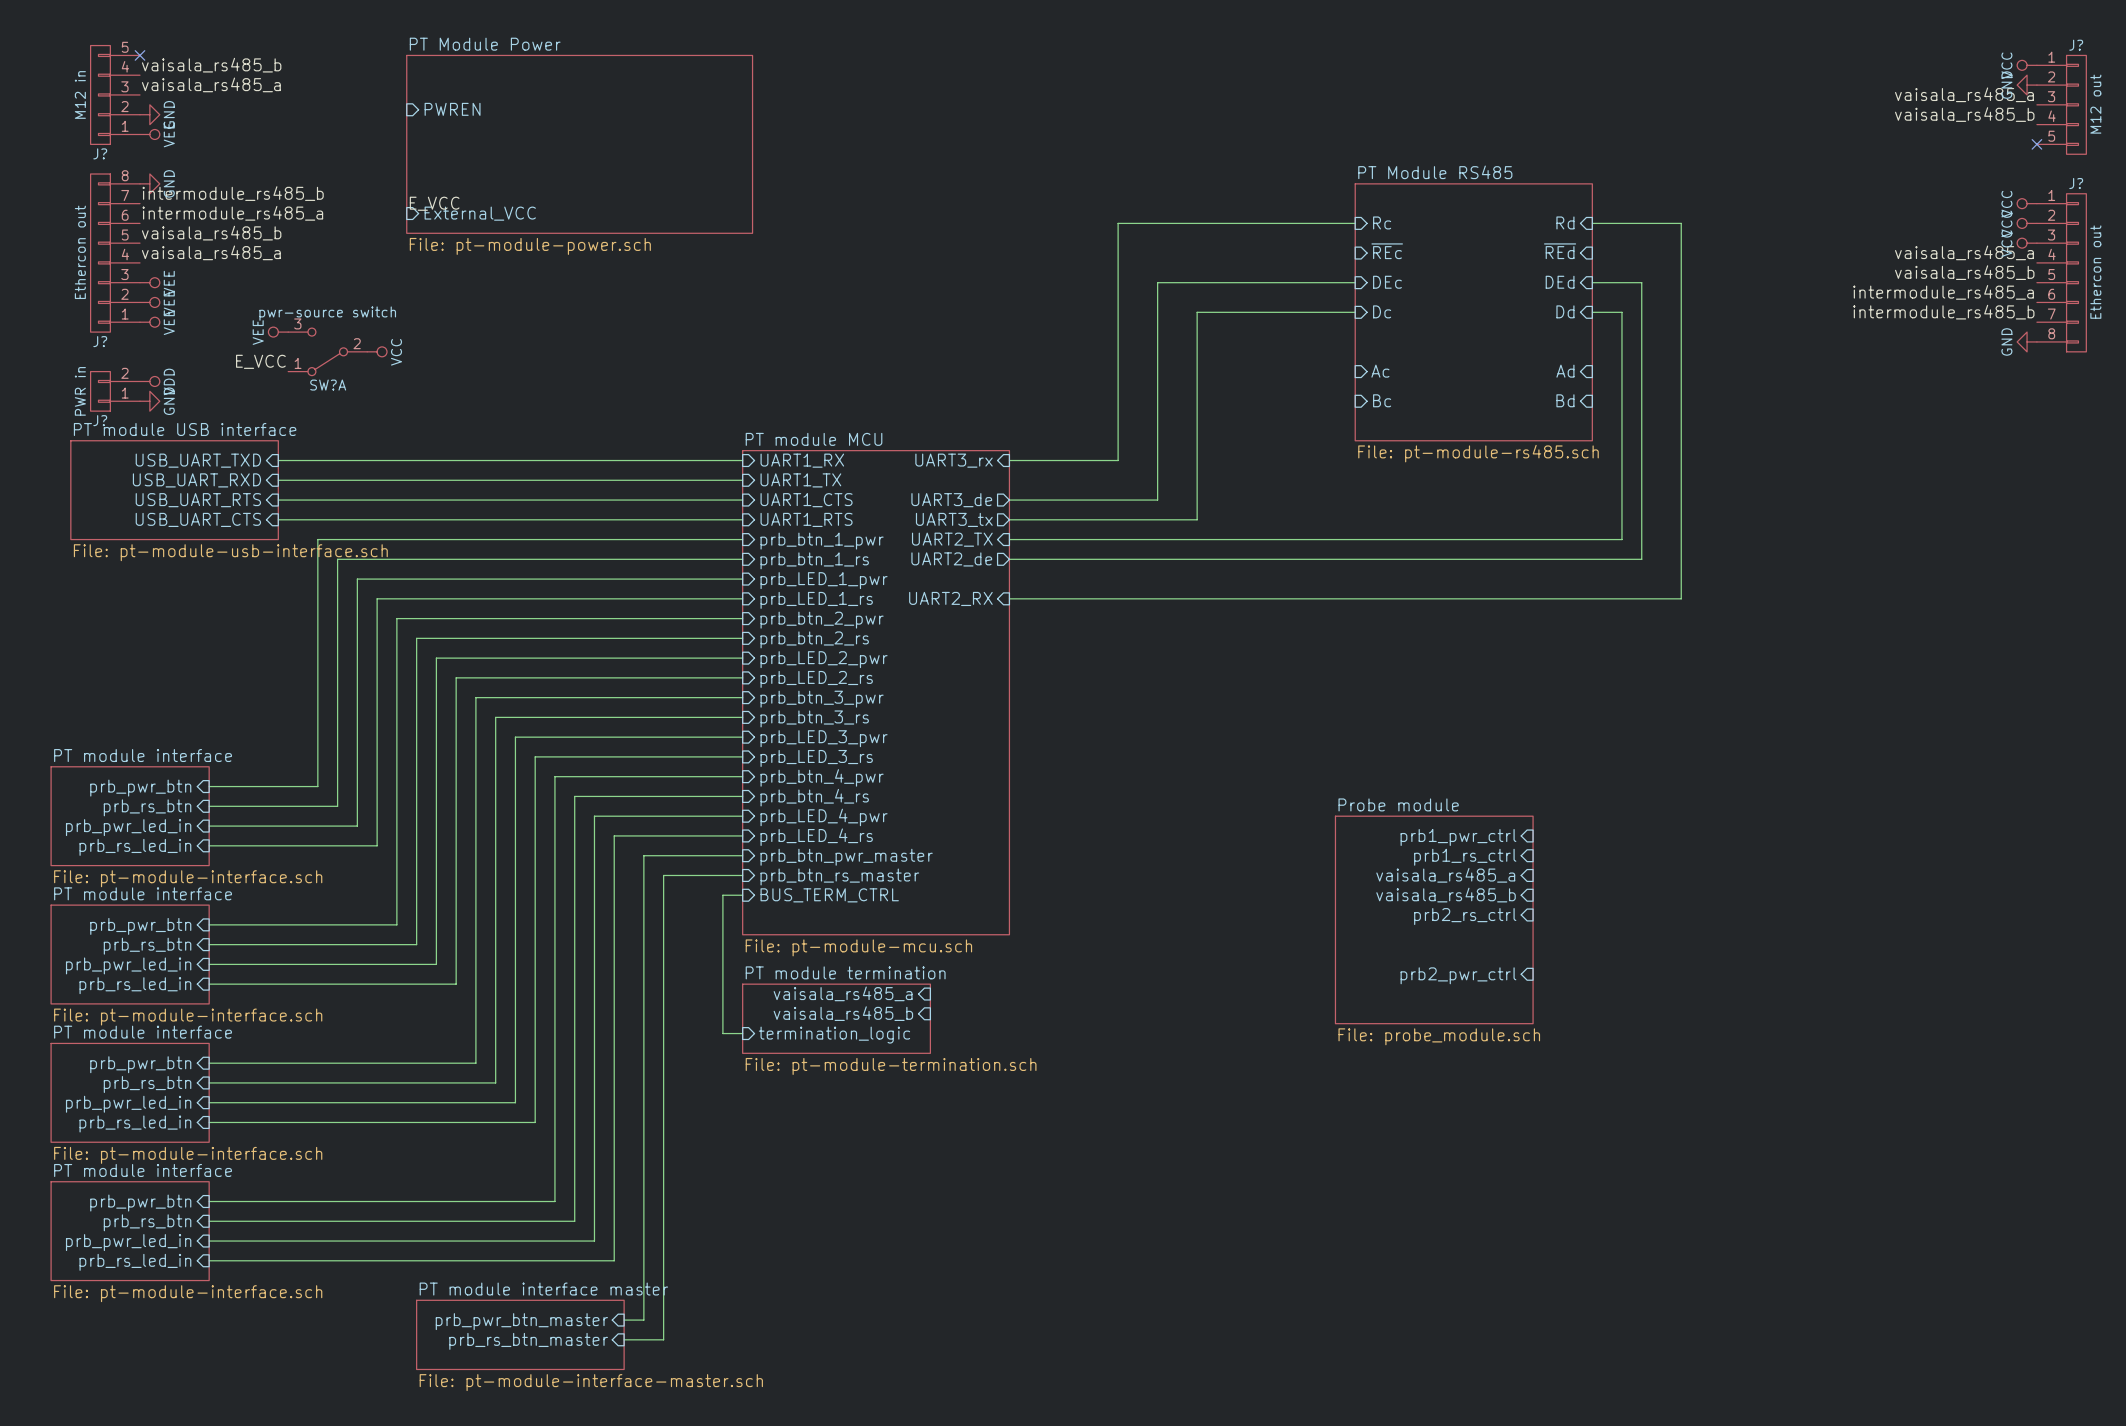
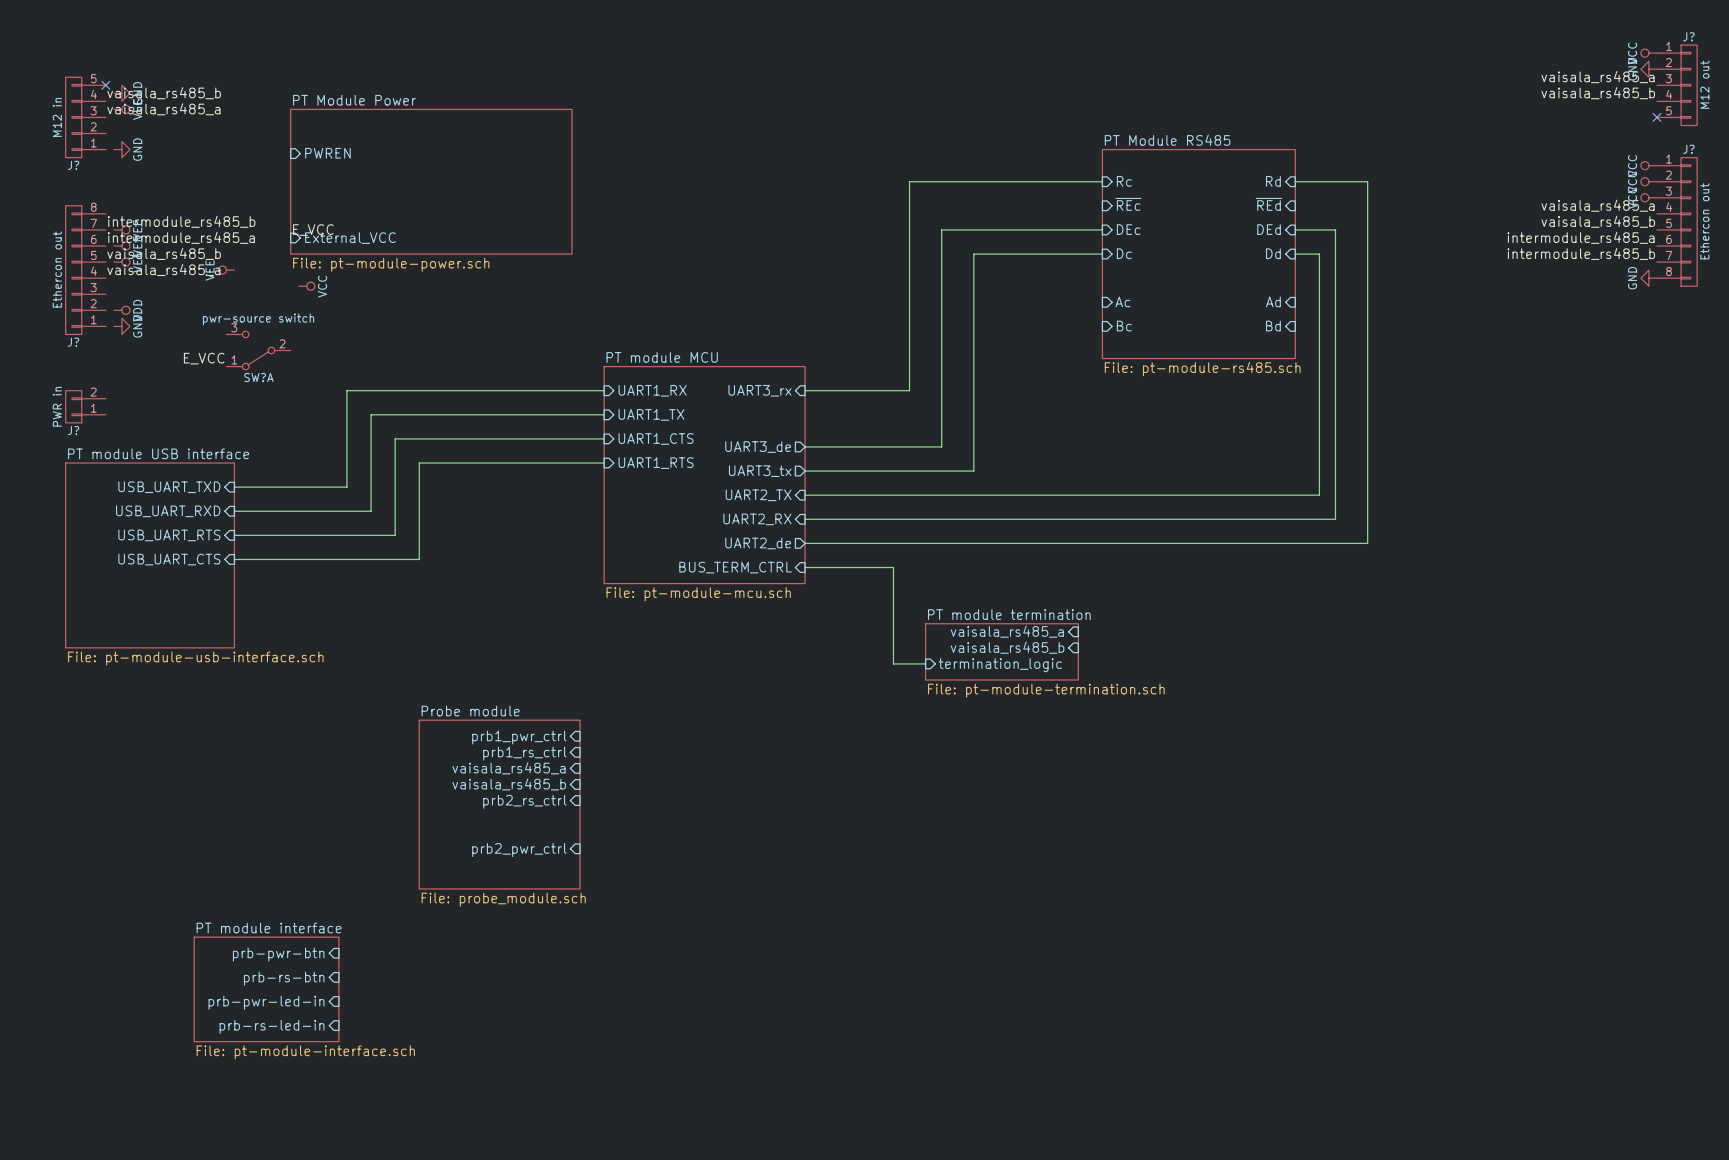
no-connect mark: (140, 55) -> none
label position: vaisala_rs485_b (211, 65) -> vaisala_rs485_b (164, 93)
label position: vaisala_rs485_a (211, 84) -> vaisala_rs485_a (163, 109)
J? position: (115, 94) -> (85, 117)
no-connect mark: none -> (105, 85)
sheet pin position: PWREN (452, 109) -> PWREN (327, 153)
sheet PT Module Power position: (579, 144) -> (431, 181)
label position: intermodule_rs485_b (233, 193) -> intermodule_rs485_b (181, 221)
label: E_VCC (434, 203) -> none
label position: intermodule_rs485_a (232, 213) -> intermodule_rs485_a (181, 237)
sheet pin position: External_VCC (480, 213) -> External_VCC (350, 238)
label: vaisala_rs485_b (211, 233) -> none
label: vaisala_rs485_a (211, 252) -> none
J? position: (115, 253) -> (85, 270)
label: none -> E_VCC (313, 230)
label: none -> vaisala_rs485_b (164, 253)
label: none -> vaisala_rs485_a (163, 269)
SW?A position: (327, 351) -> (258, 350)
label: E_VCC (260, 361) -> none
J? position: (115, 391) -> (85, 406)
label: none -> E_VCC (204, 358)
sheet pin position: USB_UART_TXD (198, 460) -> USB_UART_TXD (169, 487)
wire: (278, 460) (742, 460) -> none
sheet pin: UART1_RX (802, 460) -> none
sheet pin position: UART3_rx (954, 460) -> UART3_rx (759, 390)
wire: (1009, 460) (1118, 460) -> (805, 390) (909, 390) (909, 374)
sheet pin position: USB_UART_RXD (196, 480) -> USB_UART_RXD (168, 511)
wire: (278, 480) (426, 480) -> (346, 487) (346, 390)
sheet pin: UART1_TX (800, 480) -> UART1_RX (652, 390)
sheet PT module USB interface: File: pt-module-usb-interface.sch (174, 490) -> none
sheet pin position: USB_UART_RTS (198, 500) -> USB_UART_RTS (169, 535)
wire: (278, 500) (742, 500) -> none
sheet pin: UART1_CTS (806, 500) -> UART1_TX (651, 414)
sheet pin position: UART3_de (951, 500) -> UART3_de (758, 447)
wire: (1009, 500) (1157, 500) -> (805, 446) (941, 446) (941, 406)
wire: none -> (604, 414) (371, 414) (371, 511) (234, 511)
sheet pin position: USB_UART_CTS (198, 519) -> USB_UART_CTS (169, 559)
wire: (278, 519) (742, 519) -> none
sheet pin position: UART1_RTS (806, 519) -> UART1_RTS (656, 463)
sheet pin position: UART3_tx (954, 519) -> UART3_tx (760, 471)
wire: (1009, 519) (1197, 519) -> (805, 471) (973, 471) (973, 422)
wire: (485, 539) (317, 539) (317, 786) (209, 786) -> none
sheet pin position: UART2_TX (952, 539) -> UART2_TX (758, 495)
wire: (1009, 539) (1621, 539) -> (805, 495) (1319, 495) (1319, 438)
sheet pin: prb_btn_1_pwr (822, 541) -> UART1_CTS (656, 439)
wire: (742, 559) (337, 559) (337, 806) (209, 806) -> none
sheet pin position: UART2_de (951, 559) -> UART2_de (758, 543)
wire: (1009, 559) (1641, 559) -> (805, 519) (1335, 519) (1335, 454)
sheet pin: prb_btn_1_rs (814, 560) -> none
wire: none -> (604, 463) (419, 463) (419, 559) (234, 559)
wire: (742, 579) (357, 579) (357, 826) (209, 826) -> none
sheet pin: prb_LED_1_pwr (824, 580) -> none
sheet PT module MCU: none -> File: pt-module-mcu.sch (704, 475)
wire: (377, 598) (377, 845) (209, 845) -> (306, 487) (234, 487)
wire: (426, 598) (742, 598) -> none
sheet pin position: UART2_RX (950, 598) -> UART2_RX (757, 519)
wire: (1009, 598) (1681, 598) -> (805, 543) (1367, 543) (1367, 487)
sheet pin: prb_LED_1_rs (816, 600) -> none
wire: (742, 618) (396, 618) (396, 924) (209, 924) -> none
sheet pin: prb_btn_2_pwr (822, 620) -> none
wire: (742, 638) (416, 638) (416, 944) (209, 944) -> none
sheet pin: prb_btn_2_rs (814, 639) -> none
wire: (436, 658) (436, 964) (209, 964) -> (354, 535) (234, 535)
wire: (485, 658) (742, 658) -> (395, 535) (395, 438)
sheet pin: prb_LED_2_pwr (824, 659) -> none
wire: (742, 677) (456, 677) (456, 984) (209, 984) -> none
sheet pin: prb_LED_2_rs (816, 679) -> none
sheet PT module USB interface: none -> File: pt-module-usb-interface.sch (150, 555)
sheet PT module MCU: File: pt-module-mcu.sch (876, 692) -> none
wire: (742, 697) (475, 697) (475, 1063) (209, 1063) -> none
sheet pin: none -> BUS_TERM_CTRL (735, 567)
wire: none -> (805, 567) (893, 567) (893, 663) (925, 663)
sheet pin: prb_btn_3_pwr (822, 699) -> none
wire: (742, 717) (495, 717) (495, 1082) (209, 1082) -> none
sheet pin: prb_btn_3_rs (814, 718) -> none
wire: (742, 737) (515, 737) (515, 1102) (209, 1102) -> none
sheet pin: prb_LED_3_pwr (824, 738) -> none
wire: (742, 756) (535, 756) (535, 1122) (209, 1122) -> none
sheet pin: prb_LED_3_rs (816, 758) -> none
wire: (742, 776) (554, 776) (554, 1201) (209, 1201) -> none
sheet pin: none -> vaisala_rs485_a (1007, 631)
sheet pin: prb_btn_4_pwr (822, 777) -> none
sheet pin: prb_pwr_btn (140, 788) -> none
wire: (742, 796) (574, 796) (574, 1221) (209, 1221) -> none
sheet pin: none -> vaisala_rs485_b (1007, 647)
sheet pin: prb_btn_4_rs (814, 797) -> none
sheet PT module termination: none -> File: pt-module-termination.sch (1001, 651)
sheet pin: prb_rs_btn (147, 807) -> none
sheet PT module interface: File: pt-module-interface.sch (130, 816) -> none
wire: (742, 816) (594, 816) (594, 1241) (209, 1241) -> none
sheet pin: prb_LED_4_pwr (824, 817) -> none
sheet pin: none -> termination_logic (1000, 665)
sheet pin: prb_pwr_led_in (128, 827) -> none
wire: (742, 835) (614, 835) (614, 1260) (209, 1260) -> none
sheet pin: prb_LED_4_rs (816, 837) -> none
sheet pin: prb1_pwr_ctrl (1458, 837) -> none
sheet pin: prb_rs_led_in (135, 847) -> none
wire: (742, 855) (643, 855) (643, 1320) (624, 1320) -> none
sheet pin: prb_btn_pwr_master (846, 857) -> none
sheet pin: prb1_rs_ctrl (1465, 857) -> none
wire: (742, 875) (663, 875) (663, 1339) (624, 1339) -> none
sheet pin: vaisala_rs485_a (1445, 875) -> none
sheet pin: prb_btn_rs_master (839, 877) -> none
wire: (742, 895) (722, 895) (722, 1033) (742, 1033) -> none
sheet pin: BUS_TERM_CTRL (829, 895) -> none
sheet pin: vaisala_rs485_b (1446, 895) -> none
sheet pin: none -> prb1_pwr_ctrl (519, 737)
sheet pin: prb2_rs_ctrl (1465, 916) -> none
sheet Probe module: File: probe_module.sch (1434, 919) -> none
sheet pin: prb_pwr_btn (140, 926) -> none
sheet pin: none -> prb1_rs_ctrl (524, 753)
sheet pin: none -> vaisala_rs485_a (509, 768)
sheet pin: prb_rs_btn (147, 946) -> none
sheet PT module interface: File: pt-module-interface.sch (130, 954) -> none
sheet pin: none -> vaisala_rs485_b (509, 784)
sheet pin: prb_pwr_led_in (128, 965) -> none
sheet pin: prb2_pwr_ctrl (1458, 975) -> none
sheet pin: prb_rs_led_in (135, 985) -> none
sheet pin: none -> prb2_rs_ctrl (524, 801)
sheet Probe module: none -> File: probe_module.sch (499, 804)
sheet pin: vaisala_rs485_a (843, 993) -> none
sheet pin: vaisala_rs485_b (843, 1013) -> none
sheet PT module termination: File: pt-module-termination.sch (836, 1018) -> none
sheet pin: termination_logic (834, 1035) -> none
sheet pin: none -> prb2_pwr_ctrl (519, 850)
sheet pin: prb_pwr_btn (140, 1064) -> none
sheet pin: prb_rs_btn (147, 1084) -> none
sheet PT module interface: File: pt-module-interface.sch (130, 1092) -> none
sheet pin: prb_pwr_led_in (128, 1104) -> none
sheet pin: prb_rs_led_in (135, 1124) -> none
sheet pin: none -> prb-pwr-btn (278, 954)
sheet pin: prb_pwr_btn (140, 1203) -> none
sheet pin: none -> prb-rs-btn (284, 978)
sheet PT module interface: none -> File: pt-module-interface.sch (266, 989)
sheet pin: prb_rs_btn (147, 1222) -> none
sheet PT module interface: File: pt-module-interface.sch (130, 1231) -> none
sheet pin: none -> prb-pwr-led-in (266, 1002)
sheet pin: prb_pwr_led_in (128, 1242) -> none
sheet pin: prb_rs_led_in (135, 1262) -> none
sheet pin: none -> prb-rs-led-in (272, 1026)
sheet pin: prb_pwr_btn_master (521, 1321) -> none
sheet PT module interface master: File: pt-module-interface-master.sch (520, 1334) -> none
sheet pin: prb_rs_btn_master (528, 1341) -> none

